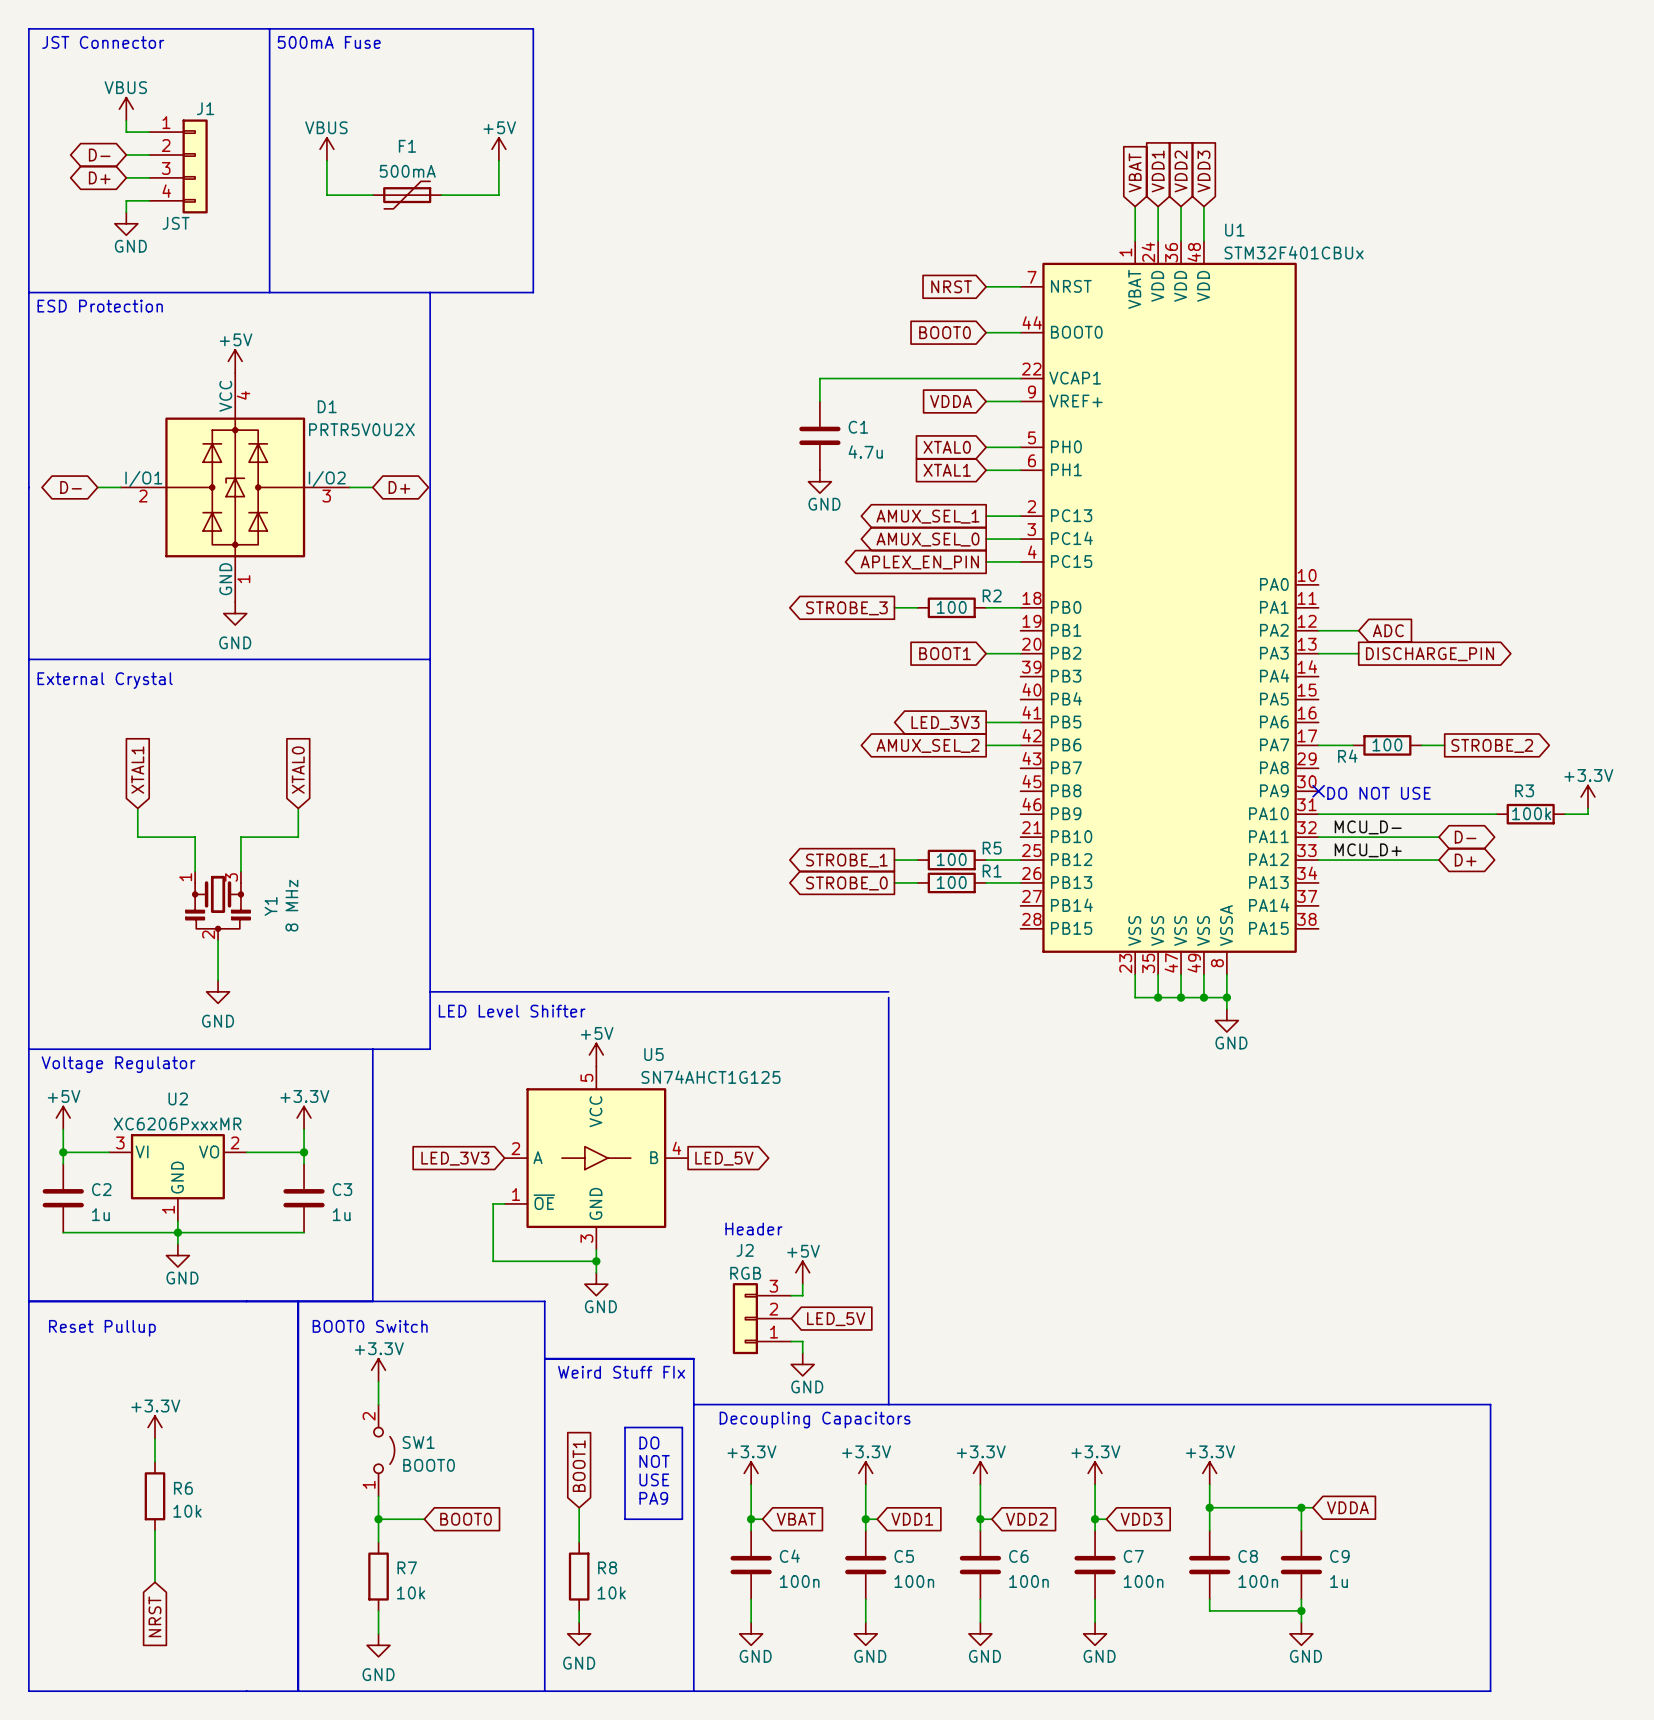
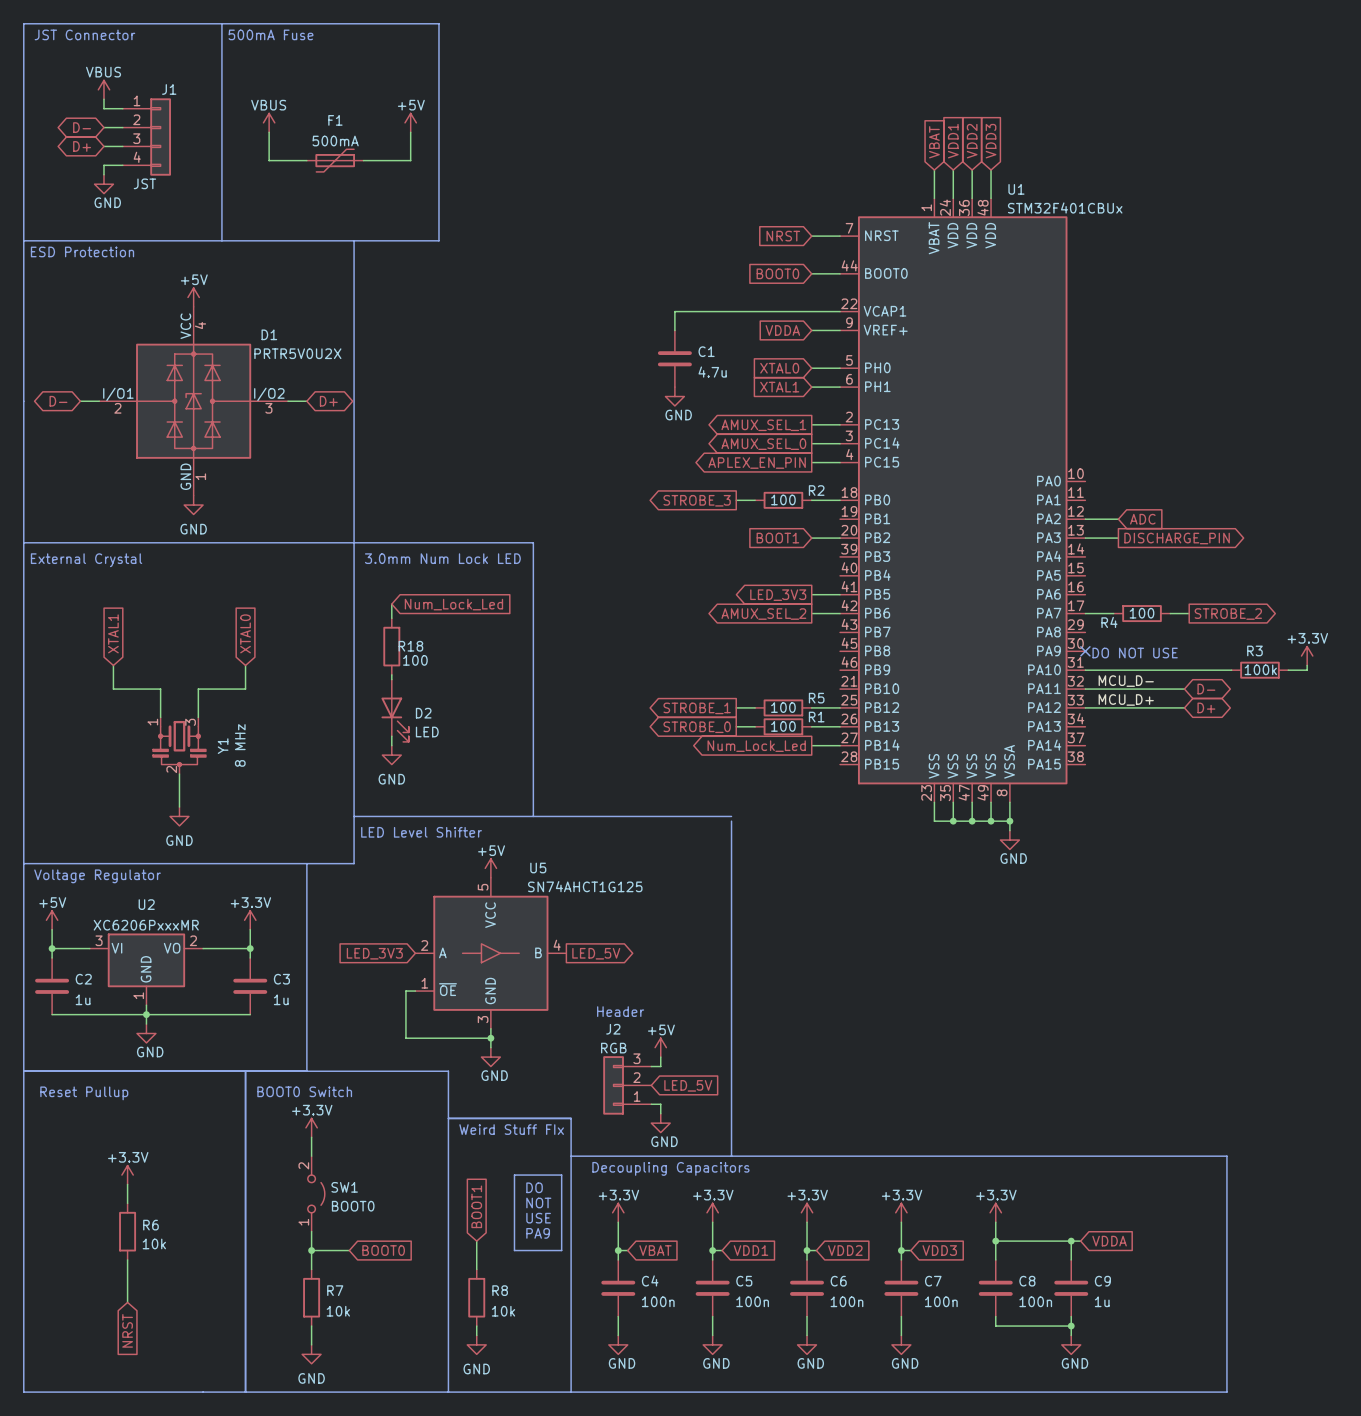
line: none -> (354, 542) (533, 542) (533, 816)
text: none -> 3.0mm Num Lock LED (442, 558)
wire: none -> (391, 604) (391, 618)
global label: none -> Num_Lock_Led (453, 604)
R18: none -> 100 (391, 646)
wire: none -> (391, 674) (391, 679)
D2: none -> LED (395, 710)
wire: none -> (391, 736) (391, 745)
wire: none -> (811, 745) (840, 745)
global label: none -> Num_Lock_Led (756, 746)
power symbol: none -> GND (391, 755)

